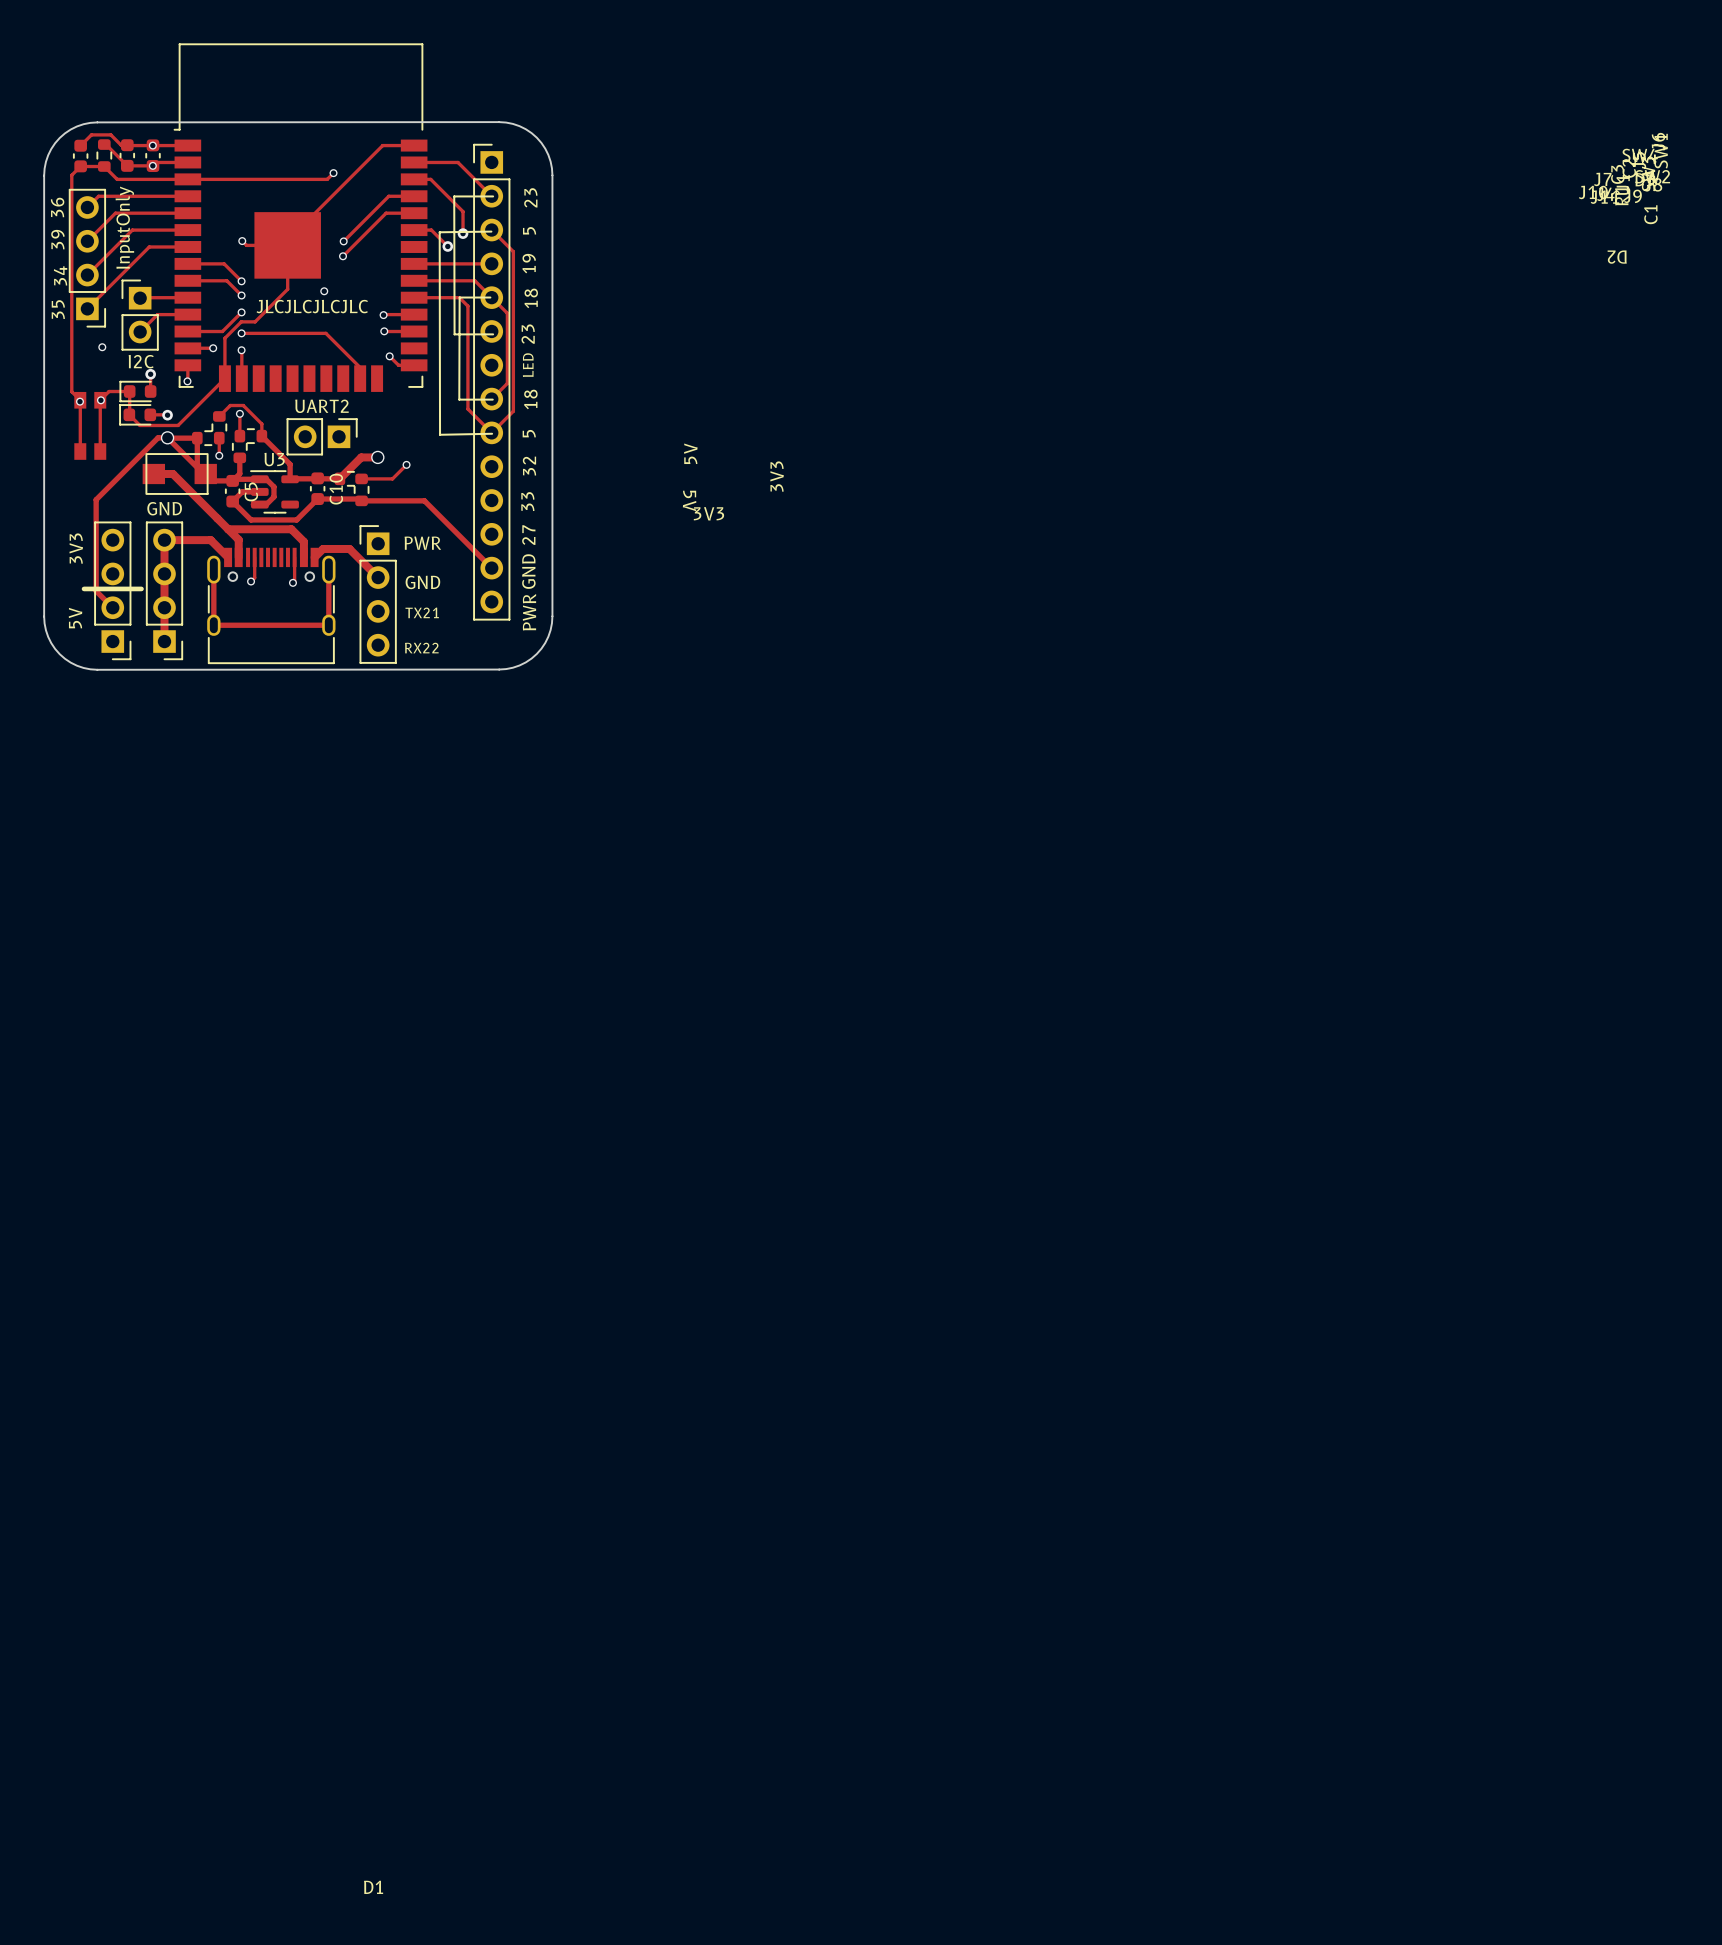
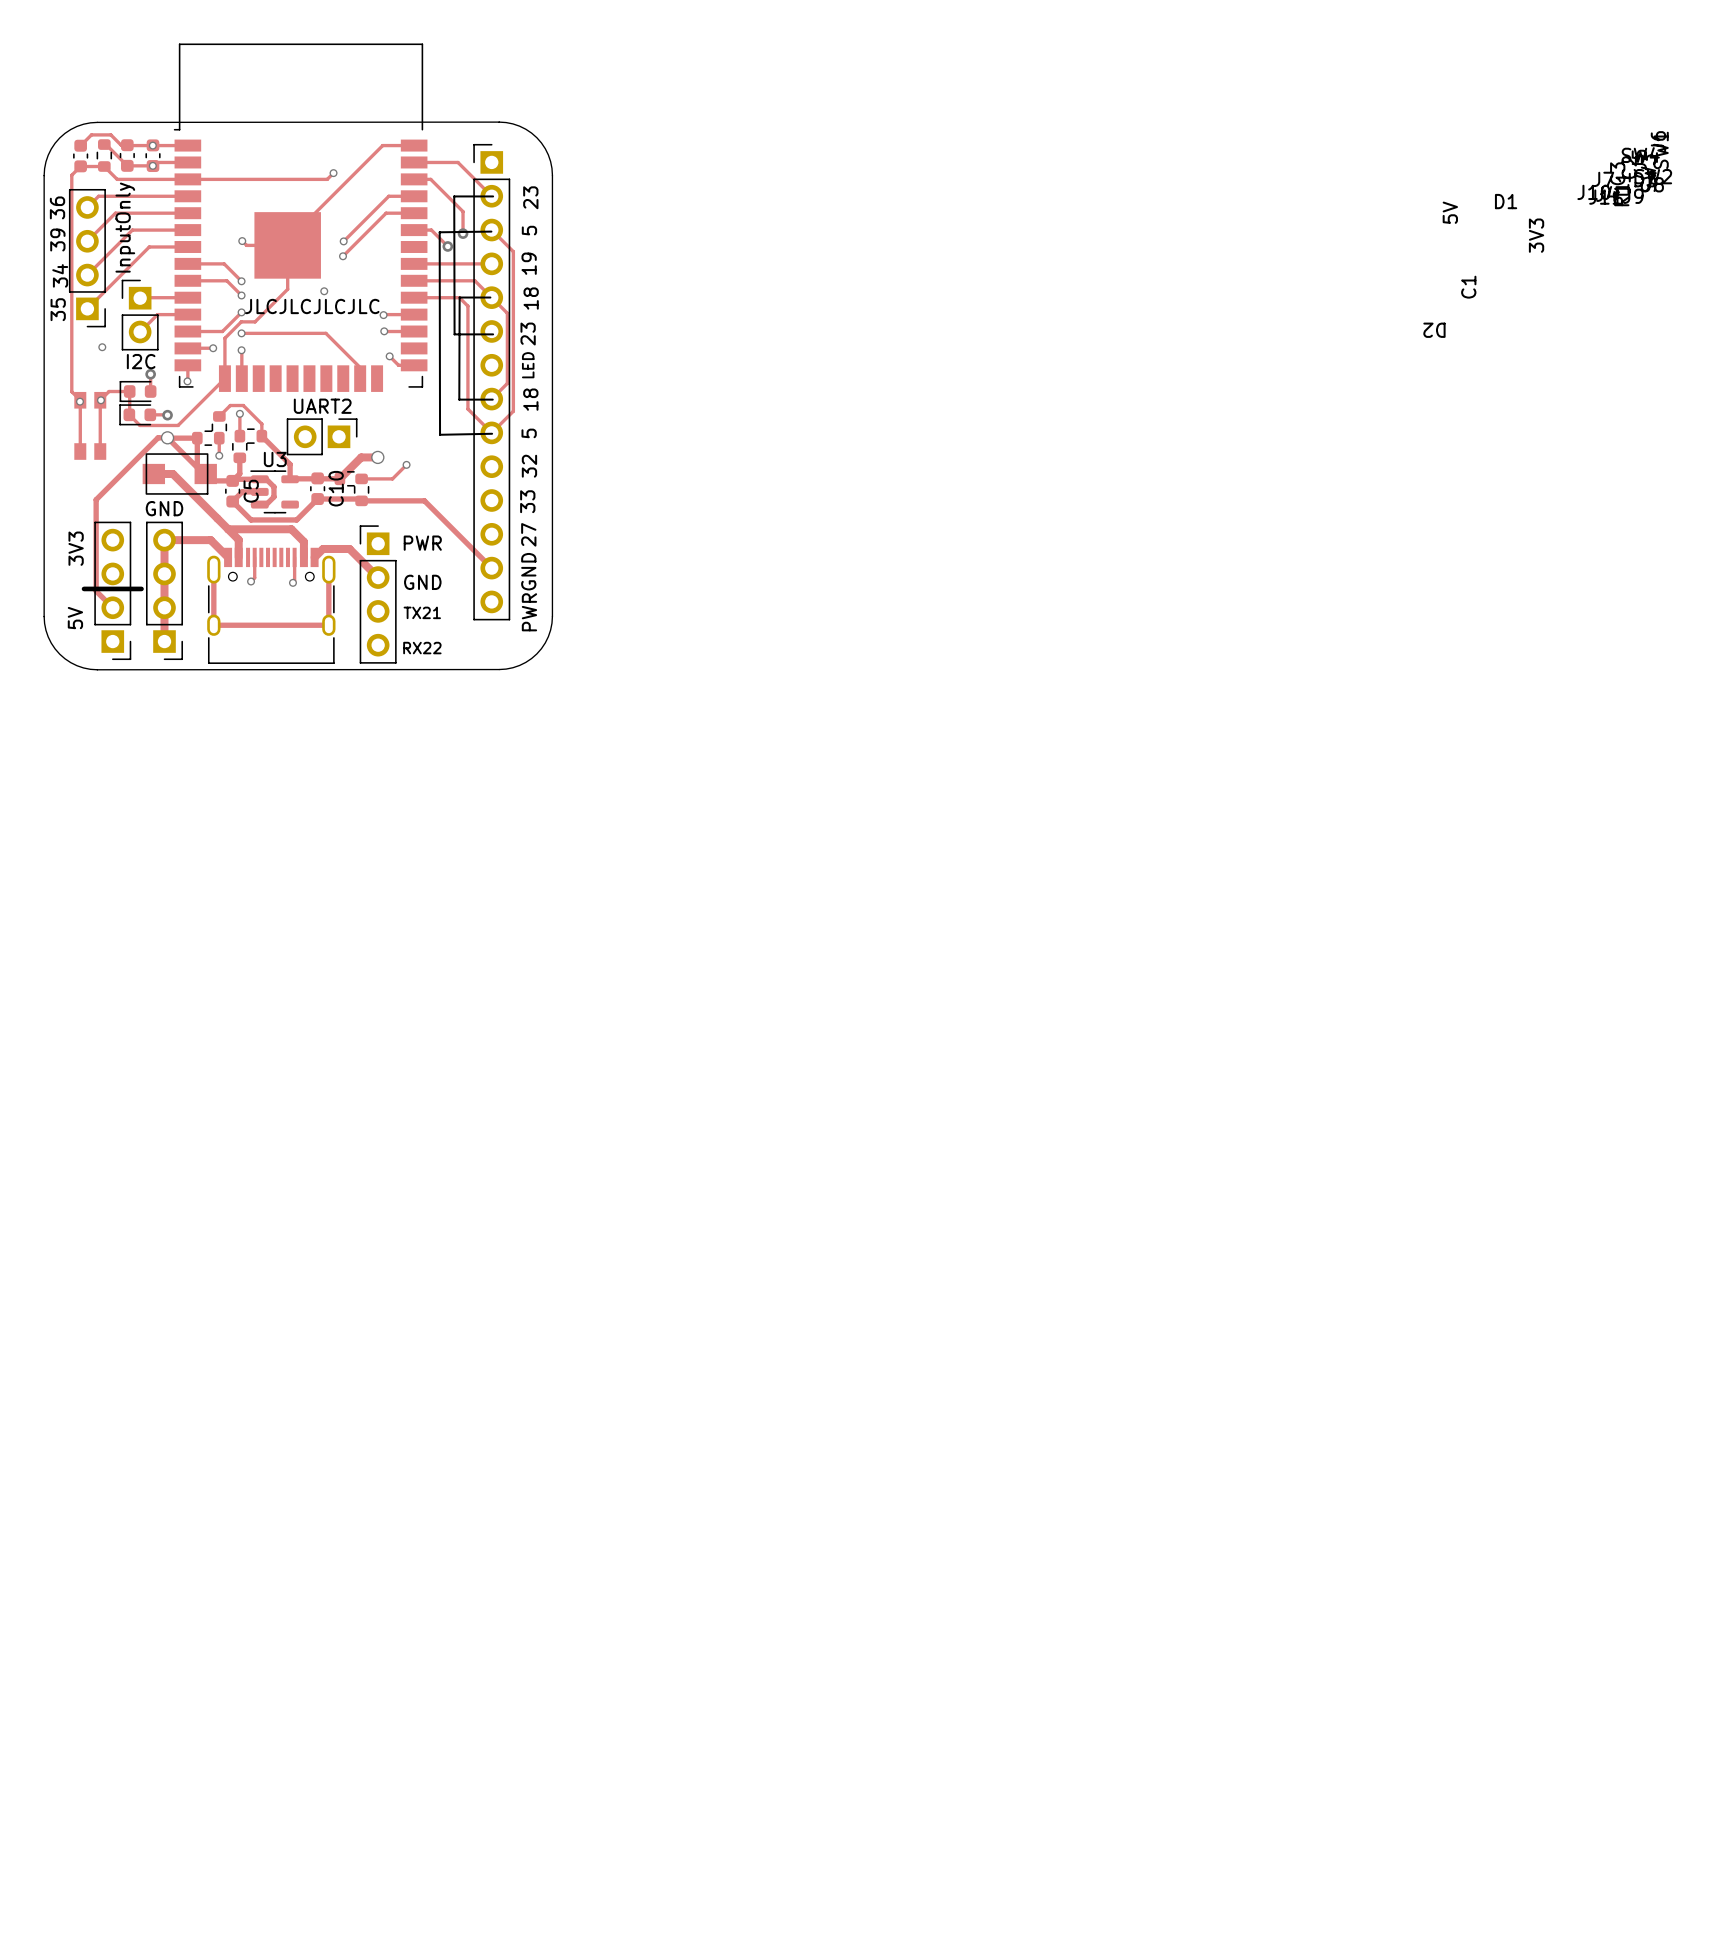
text: none -> 5V (1450, 212)
C1 name position: C1 (1650, 214) -> C1 (1468, 287)
text: none -> 3V3 (1536, 235)
D2 name position: D2 (1617, 257) -> D2 (1434, 330)
text: 5V (690, 453) -> none
text: 3V3 (777, 476) -> none
text: 5V (689, 500) -> none
text: 3V3 (708, 513) -> none
D1 name position: D1 (373, 1887) -> D1 (1506, 201)

